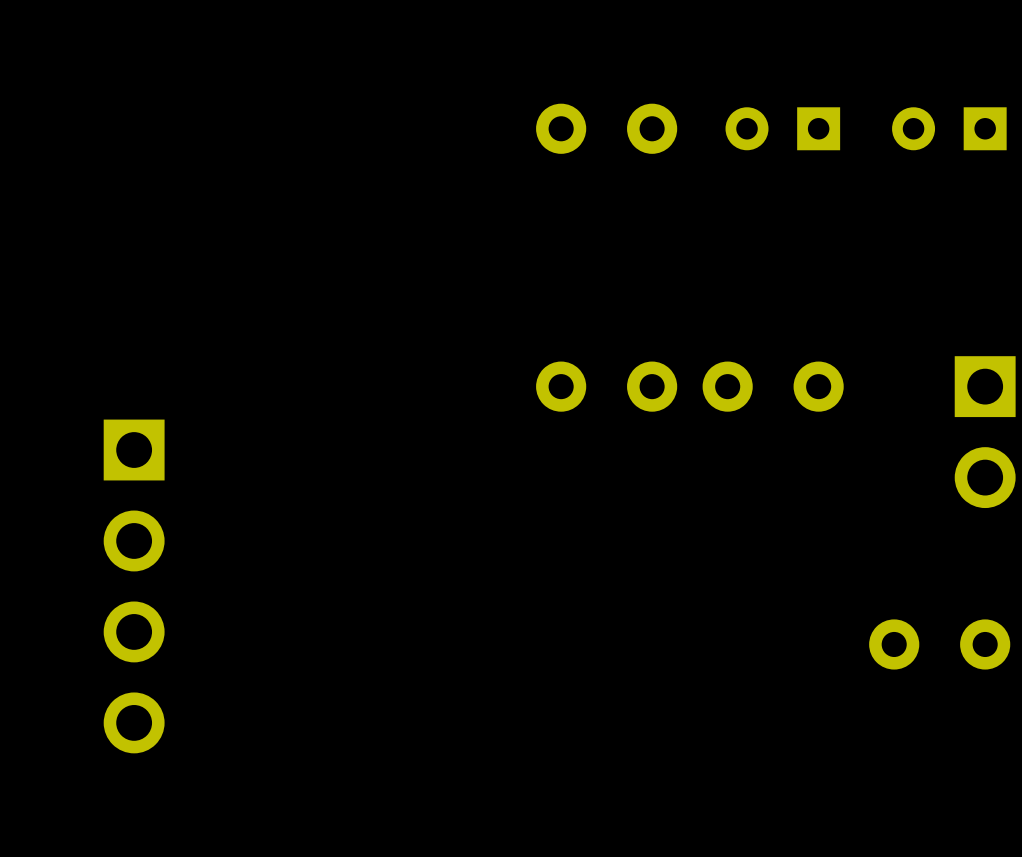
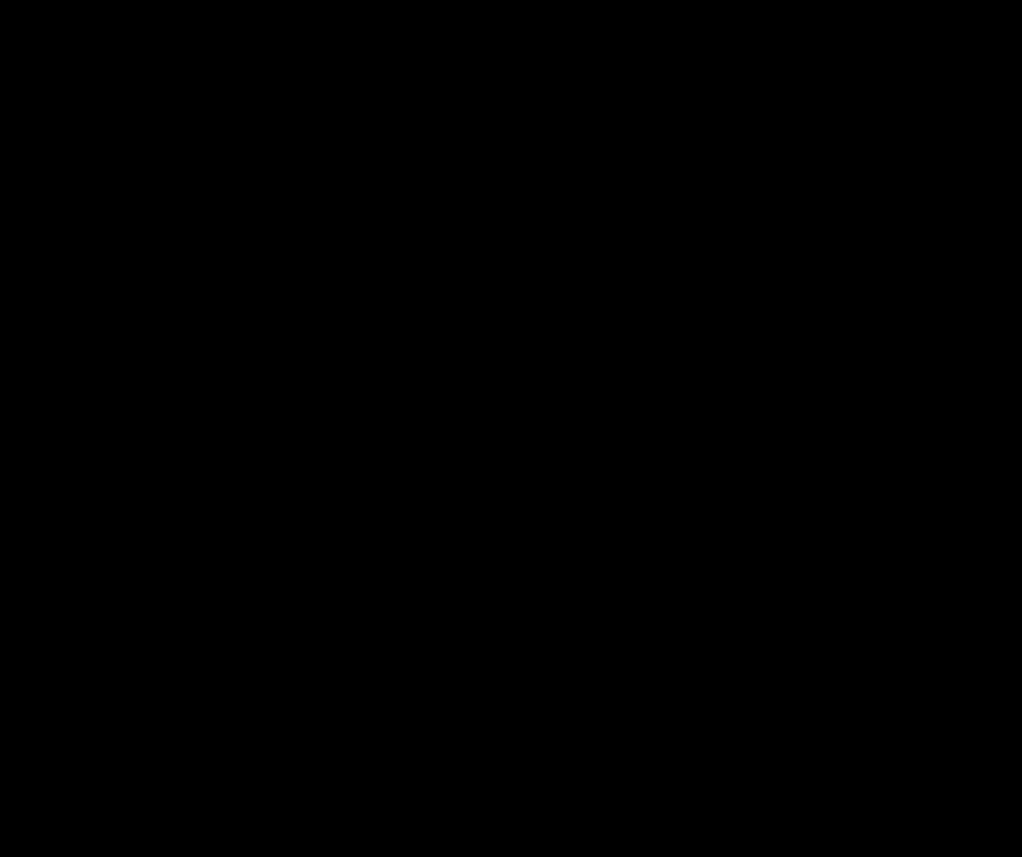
part: (606, 128) -> none
part: (782, 128) -> none
part: (949, 128) -> none
part: (606, 386) -> none
part: (773, 386) -> none
part: (985, 432) -> none
part: (134, 586) -> none
part: (939, 644) -> none

